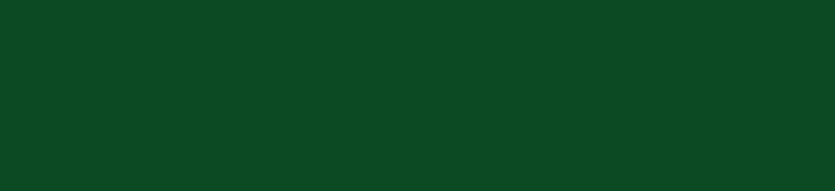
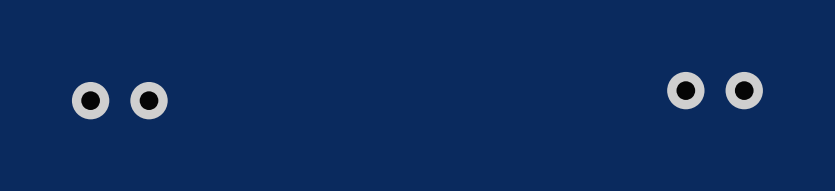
part: none -> (715, 90)
part: none -> (119, 100)

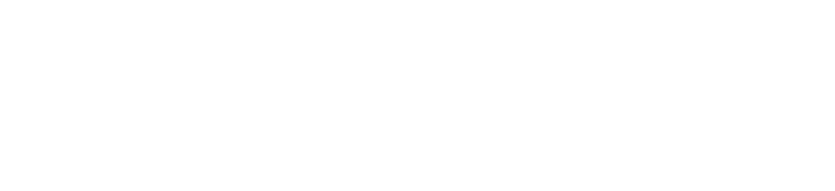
part: (715, 90) -> none
part: (119, 100) -> none

